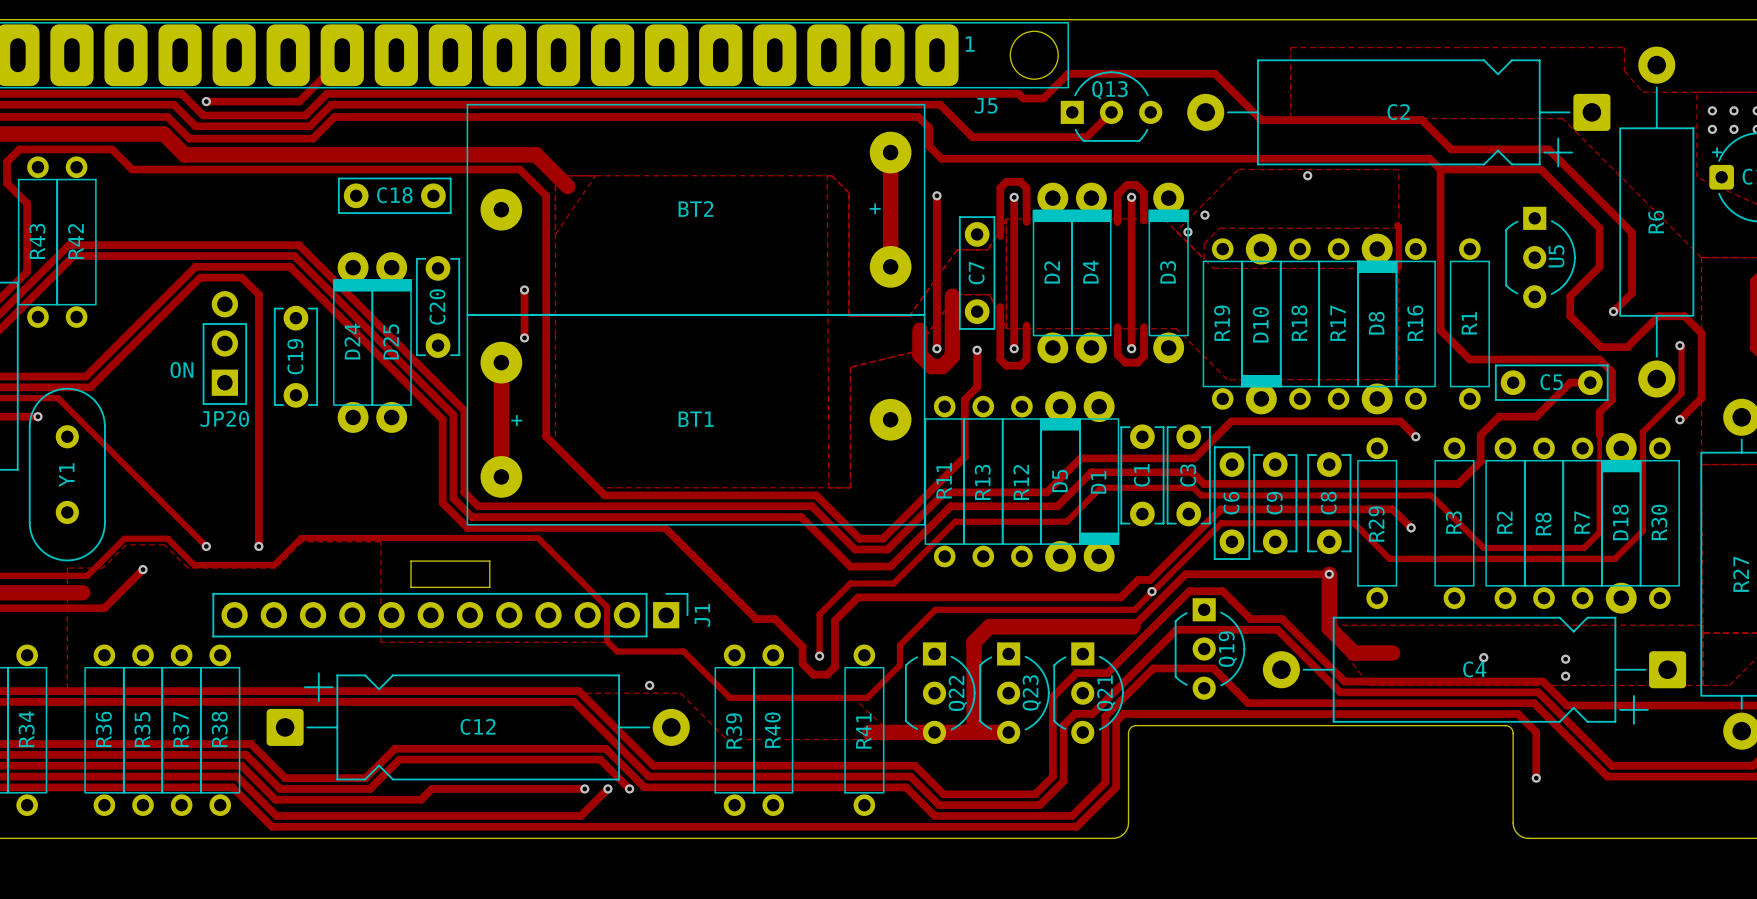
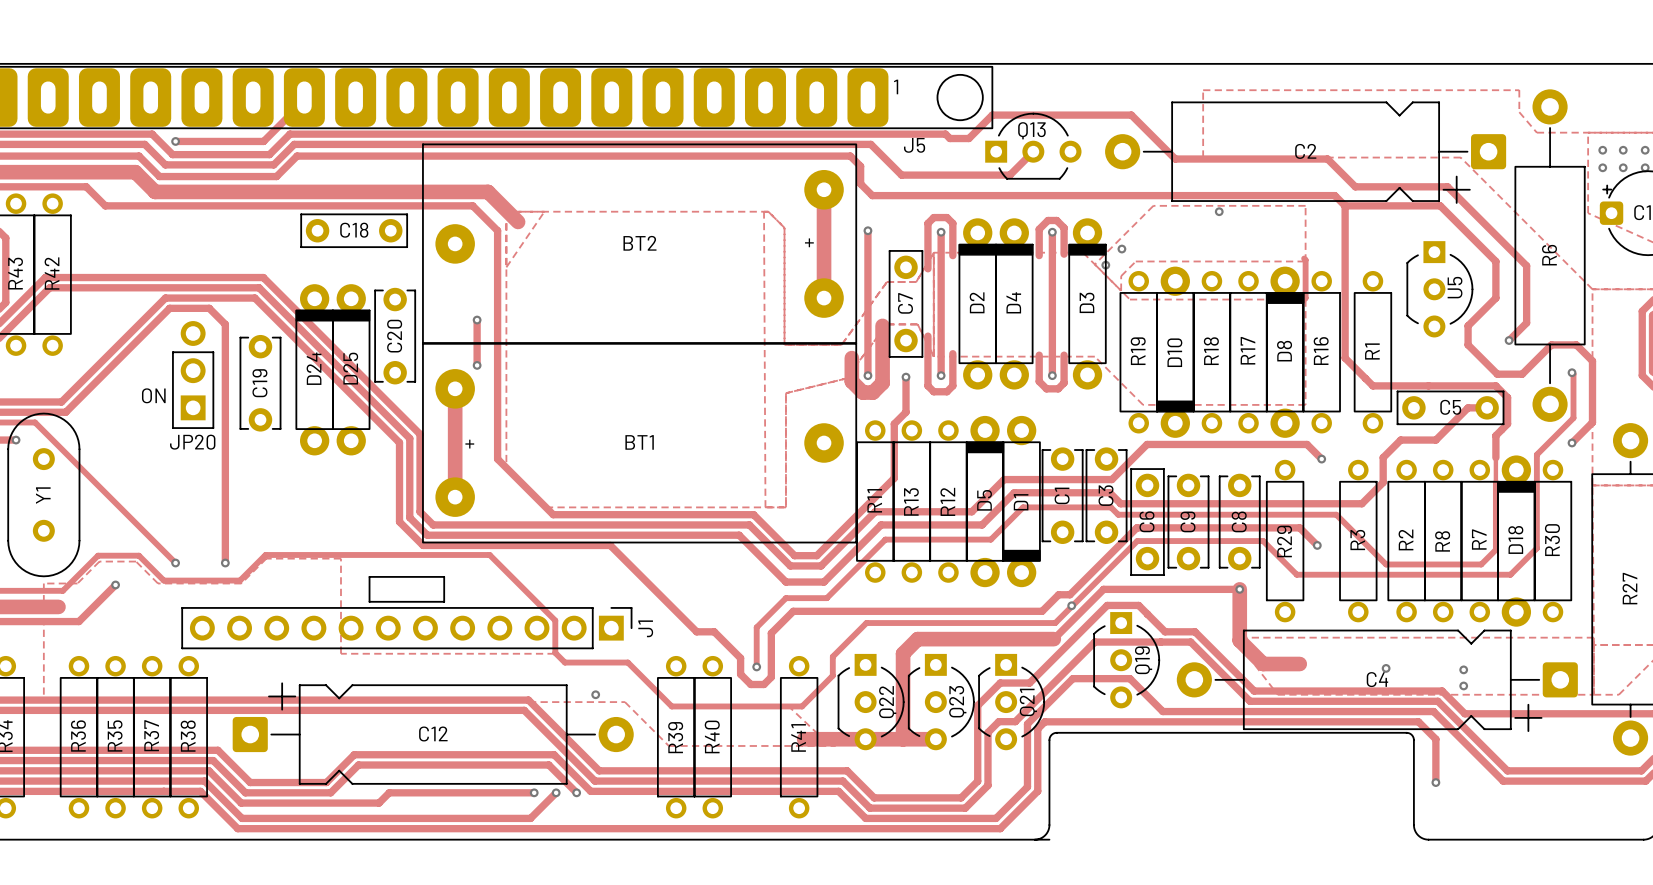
board edge: none -> (1034, 839) (1049, 839)

